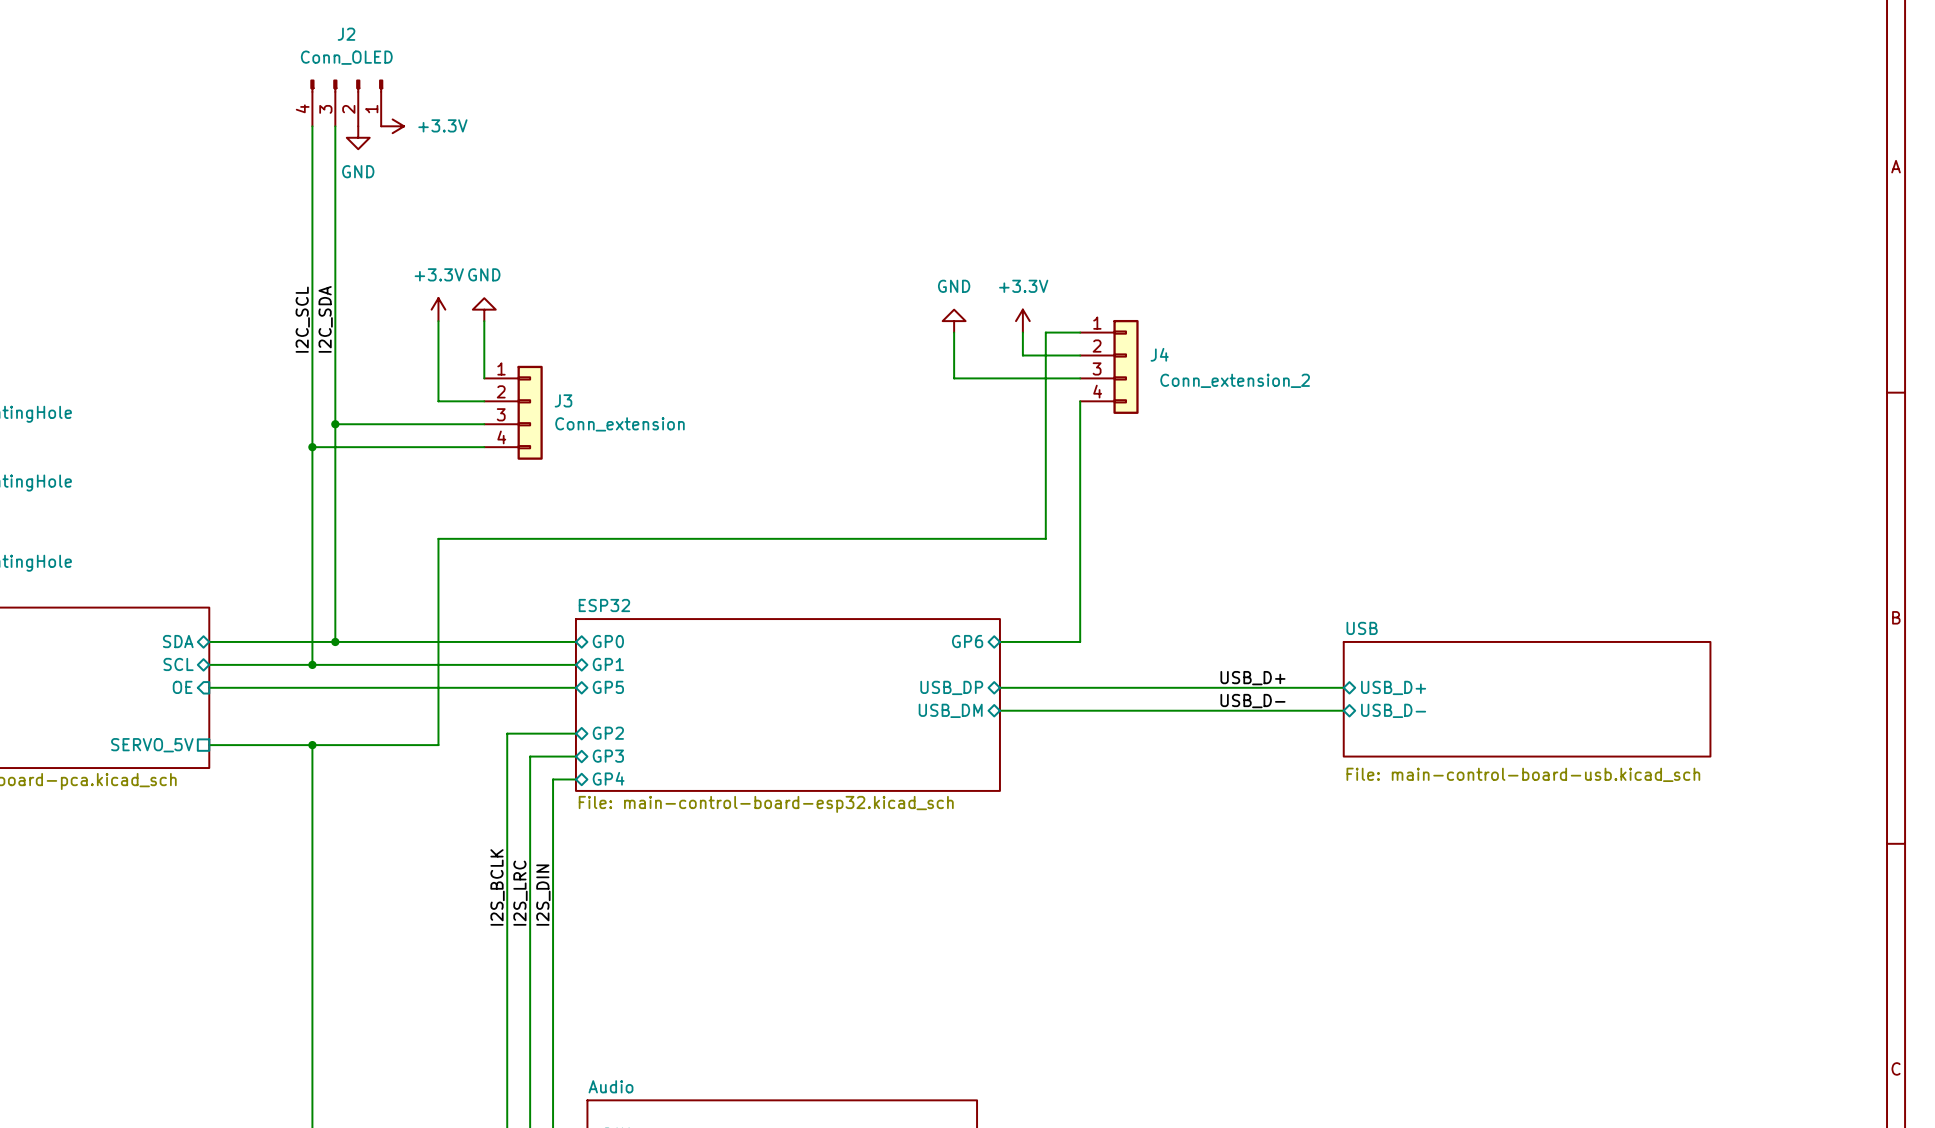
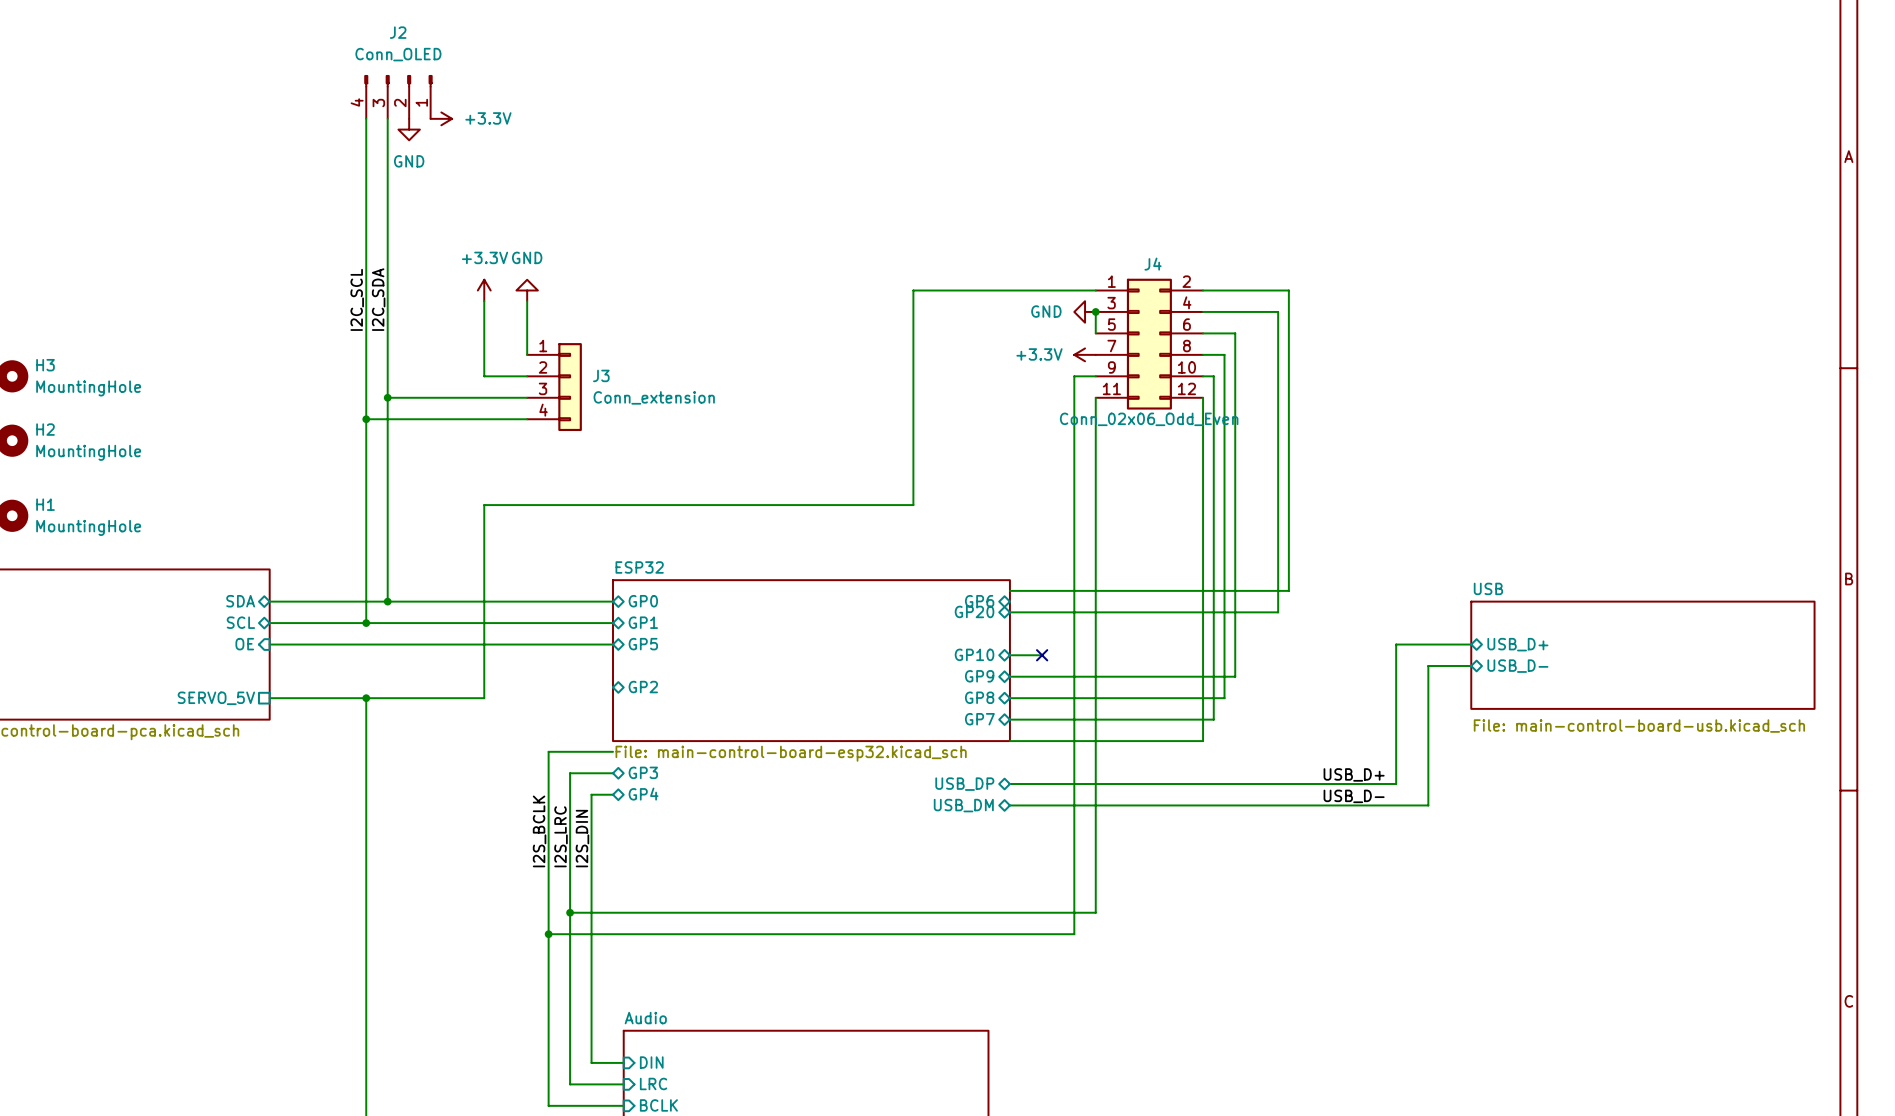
power symbol text position: +3.3V (1023, 286) -> +3.3V (1039, 354)
wire: none -> (1203, 290) (1288, 290) (1288, 590) (1009, 590)
J4 symbol: [1080, 319, 1139, 414] -> [1095, 278, 1204, 410]
power symbol rotation: 0° (954, 321) -> 90° counterclockwise (1085, 311)
power symbol position: GND (954, 321) -> GND (1085, 311)
power symbol rotation: 0° (1022, 321) -> 90° counterclockwise (1085, 354)
power symbol position: +3.3V (1022, 321) -> +3.3V (1085, 354)
wire: (954, 332) (954, 378) (1080, 378) -> none
wire: (1022, 332) (1022, 355) (1080, 355) -> none
wire: (1080, 332) (1045, 332) (1045, 538) (896, 538) -> (1095, 290) (913, 290) (913, 505)
wire: none -> (1095, 311) (1095, 333)
junction: none -> (1095, 311)
wire: none -> (1203, 311) (1278, 311) (1278, 612) (1009, 612)
J4 name position: J4 (1159, 354) -> J4 (1153, 264)
wire: none -> (1203, 333) (1235, 333) (1235, 676) (1009, 676)
wire: none -> (1203, 354) (1224, 354) (1224, 698) (1009, 698)
J4 value: Conn_extension_2 (1235, 380) -> Conn_02x06_Odd_Even (1149, 419)
wire: (1080, 401) (1080, 641) (999, 641) -> none
wire: none -> (1095, 376) (1074, 376) (1074, 934) (548, 934)
wire: none -> (1203, 376) (1213, 376) (1213, 719) (1009, 719)
wire: none -> (1095, 397) (1095, 912) (570, 912)
wire: none -> (1203, 397) (1203, 741) (1009, 741)
sheet pin: none -> GP20 (974, 611)
label position: USB_D+ (1252, 678) -> USB_D+ (1354, 774)
sheet pin position: USB_DP (951, 687) -> USB_DP (964, 784)
wire: (999, 687) (1343, 687) -> none
sheet pin position: USB_D+ (1393, 687) -> USB_D+ (1517, 644)
wire: none -> (1471, 644) (1396, 644) (1396, 784) (1009, 784)
sheet pin: none -> GP10 (974, 654)
wire: none -> (1009, 655) (1042, 655)
no-connect mark: none -> (1042, 655)
sheet USB position: (1527, 699) -> (1642, 655)
label position: USB_D- (1252, 701) -> USB_D- (1354, 796)
sheet pin position: USB_DM (950, 710) -> USB_DM (963, 805)
wire: (999, 710) (1343, 710) -> none
sheet pin position: USB_D- (1393, 710) -> USB_D- (1517, 666)
wire: none -> (1471, 665) (1428, 665) (1428, 805) (1009, 805)
sheet pin: none -> GP9 (979, 676)
wire: (575, 733) (507, 733) (507, 802) -> (613, 751) (548, 751)
sheet pin: none -> GP8 (979, 697)
wire: (575, 756) (530, 756) (530, 825) -> (613, 773) (570, 773)
sheet pin position: GP3 (608, 756) -> GP3 (643, 772)
sheet pin: none -> GP7 (979, 719)
sheet pin position: GP4 (608, 778) -> GP4 (643, 794)
wire: (575, 779) (553, 779) (553, 848) -> (613, 794) (591, 794)
junction: none -> (570, 912)
junction: none -> (548, 934)

